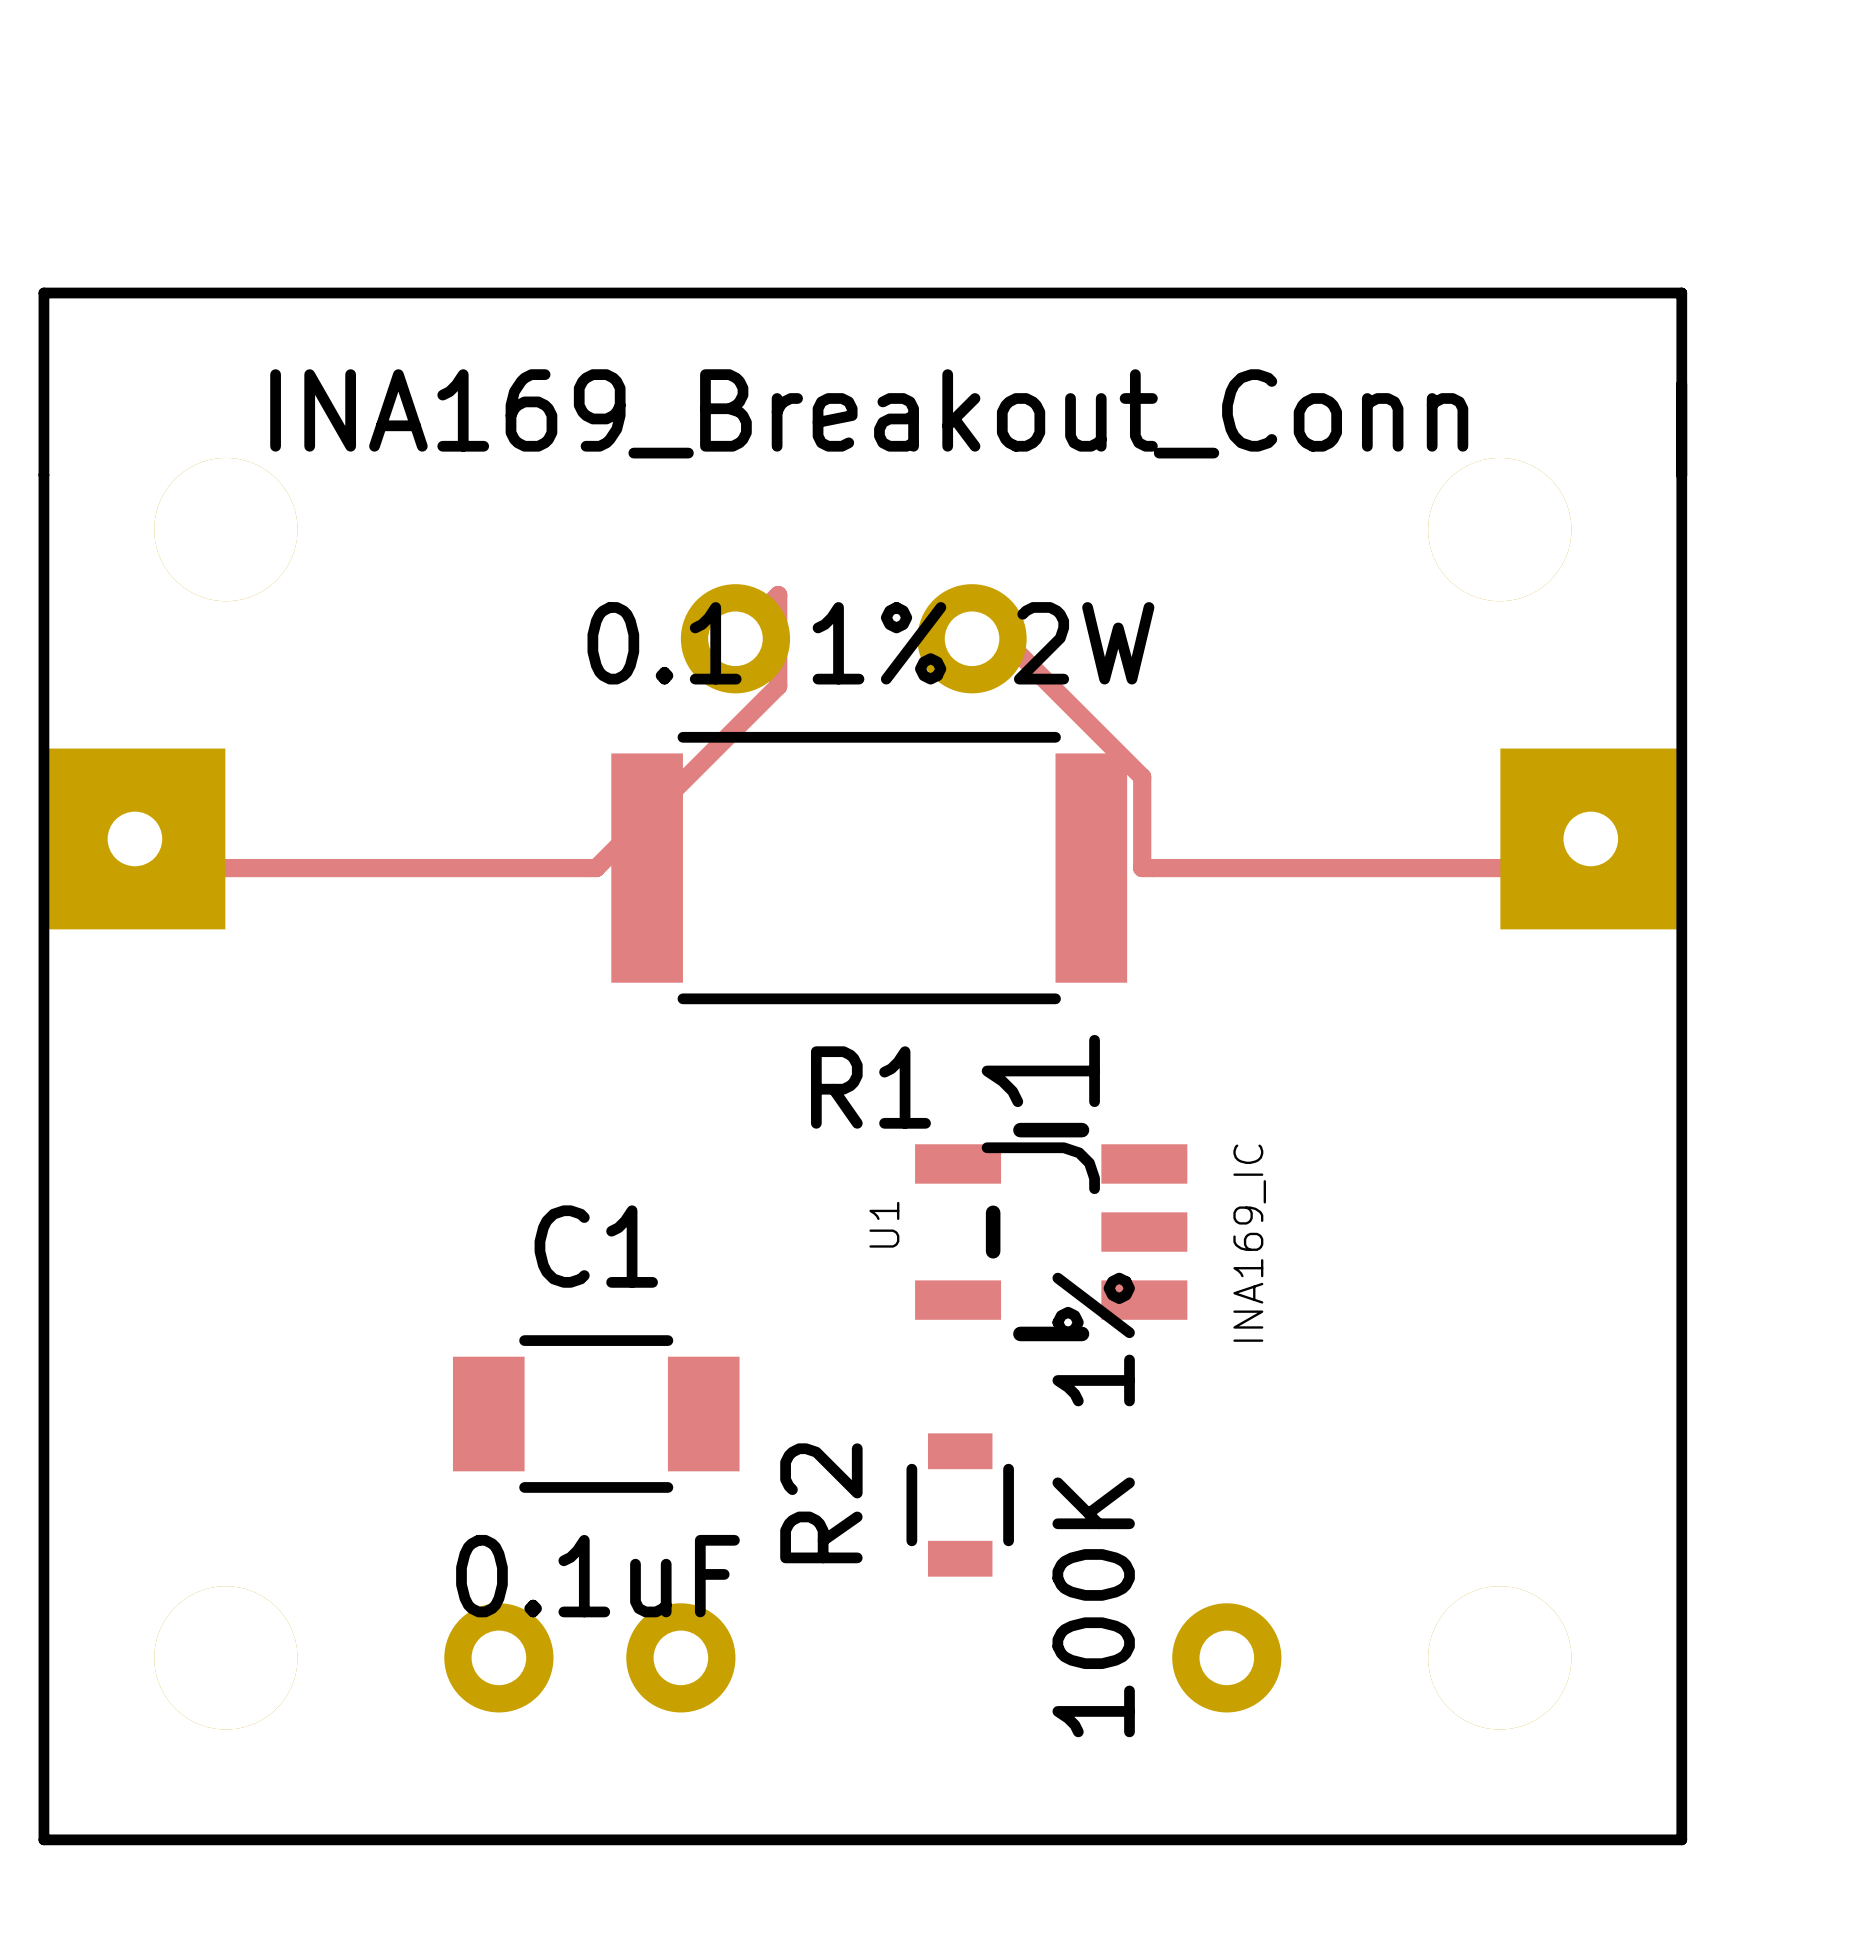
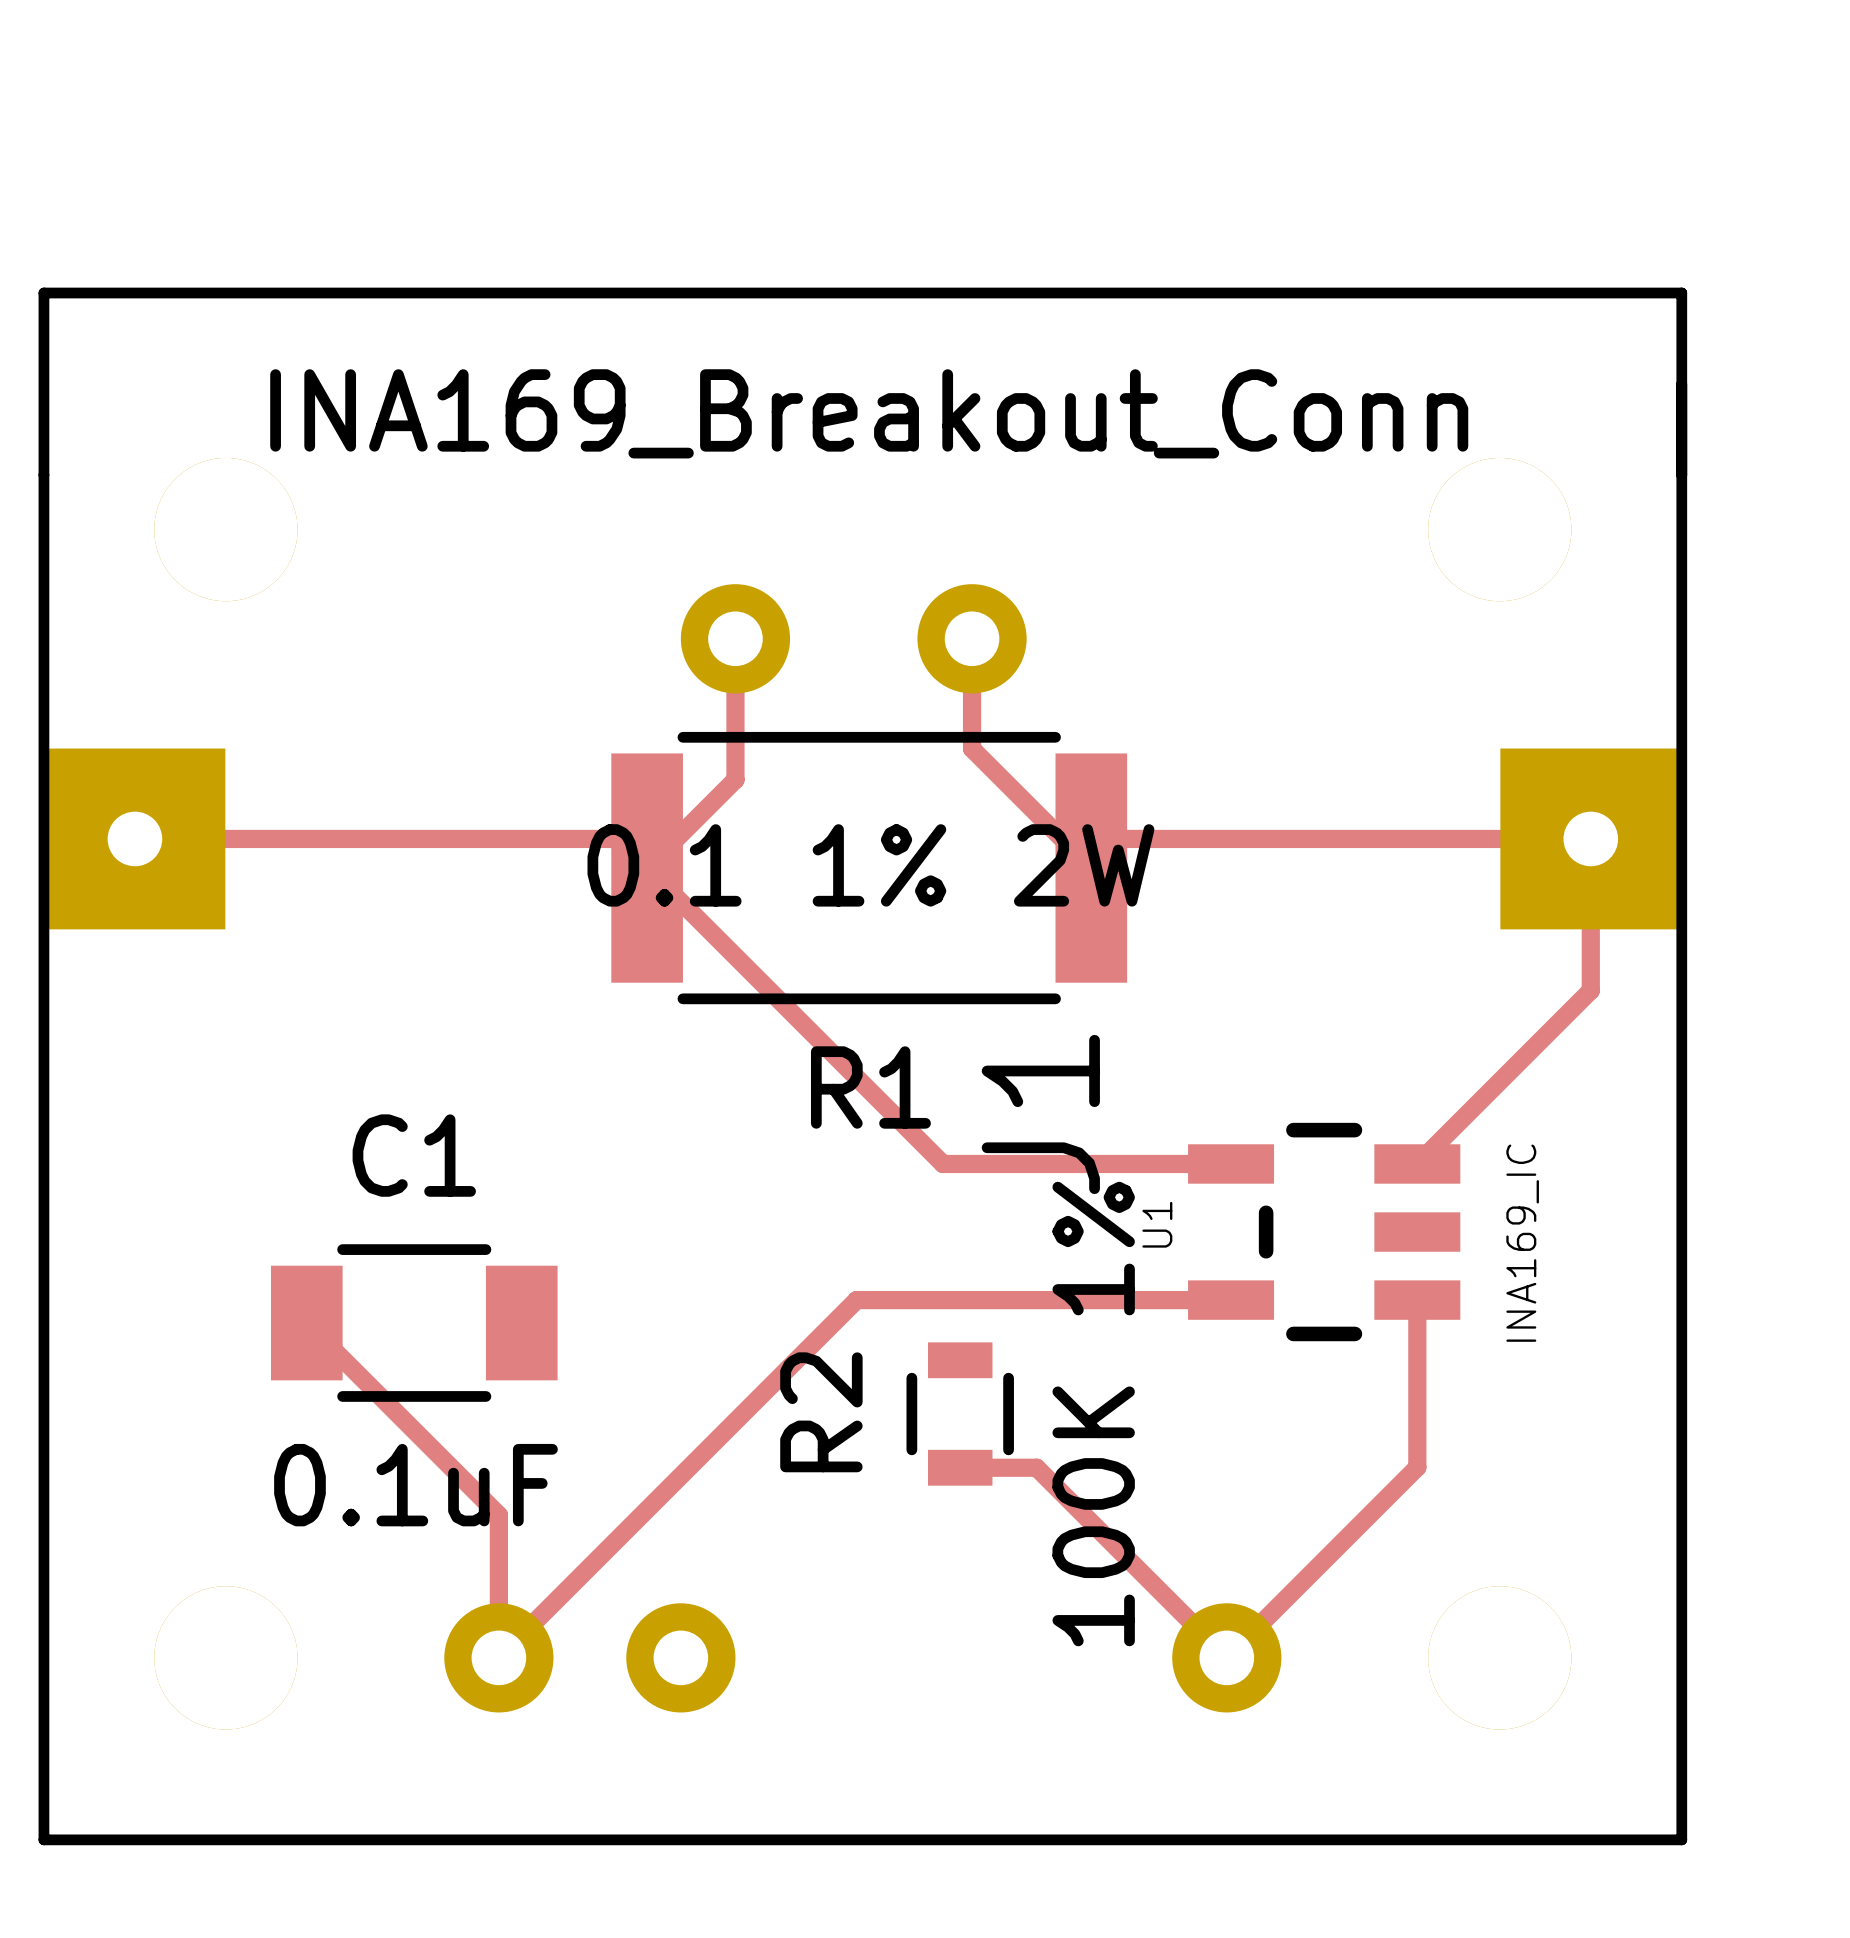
track: (735, 638) (778, 595) (778, 686) (596, 868) (141, 868) (134, 838) -> (735, 638) (735, 779) (647, 868)
track: (972, 638) (960, 595) (1142, 777) (1142, 868) (1597, 868) -> (972, 638) (972, 748) (1091, 868) (1120, 838) (1590, 838) (1590, 990) (1417, 1163)
R1 value position: 0.1 1% 2W (870, 643) -> 0.1 1% 2W (870, 865)
track: none -> (134, 838) (618, 838) (943, 1163) (1231, 1163)
U1 position: (1051, 1232) -> (1324, 1232)
track: none -> (1231, 1300) (856, 1300) (498, 1657) (498, 1515) (306, 1323)
track: none -> (1417, 1300) (1417, 1467) (1226, 1657) (1036, 1467) (960, 1467)
C1 position: (596, 1414) -> (414, 1323)
R2 position: (960, 1505) -> (960, 1414)

